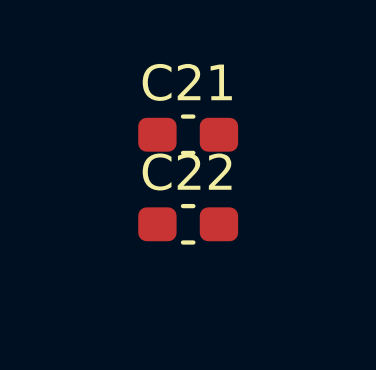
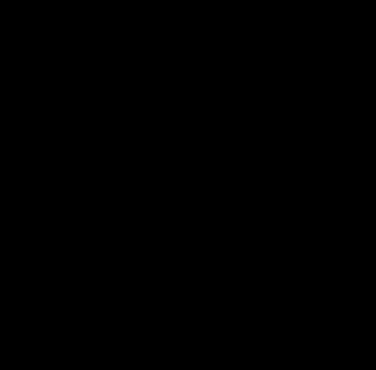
C21: (188, 134) -> none
C22: (188, 224) -> none

